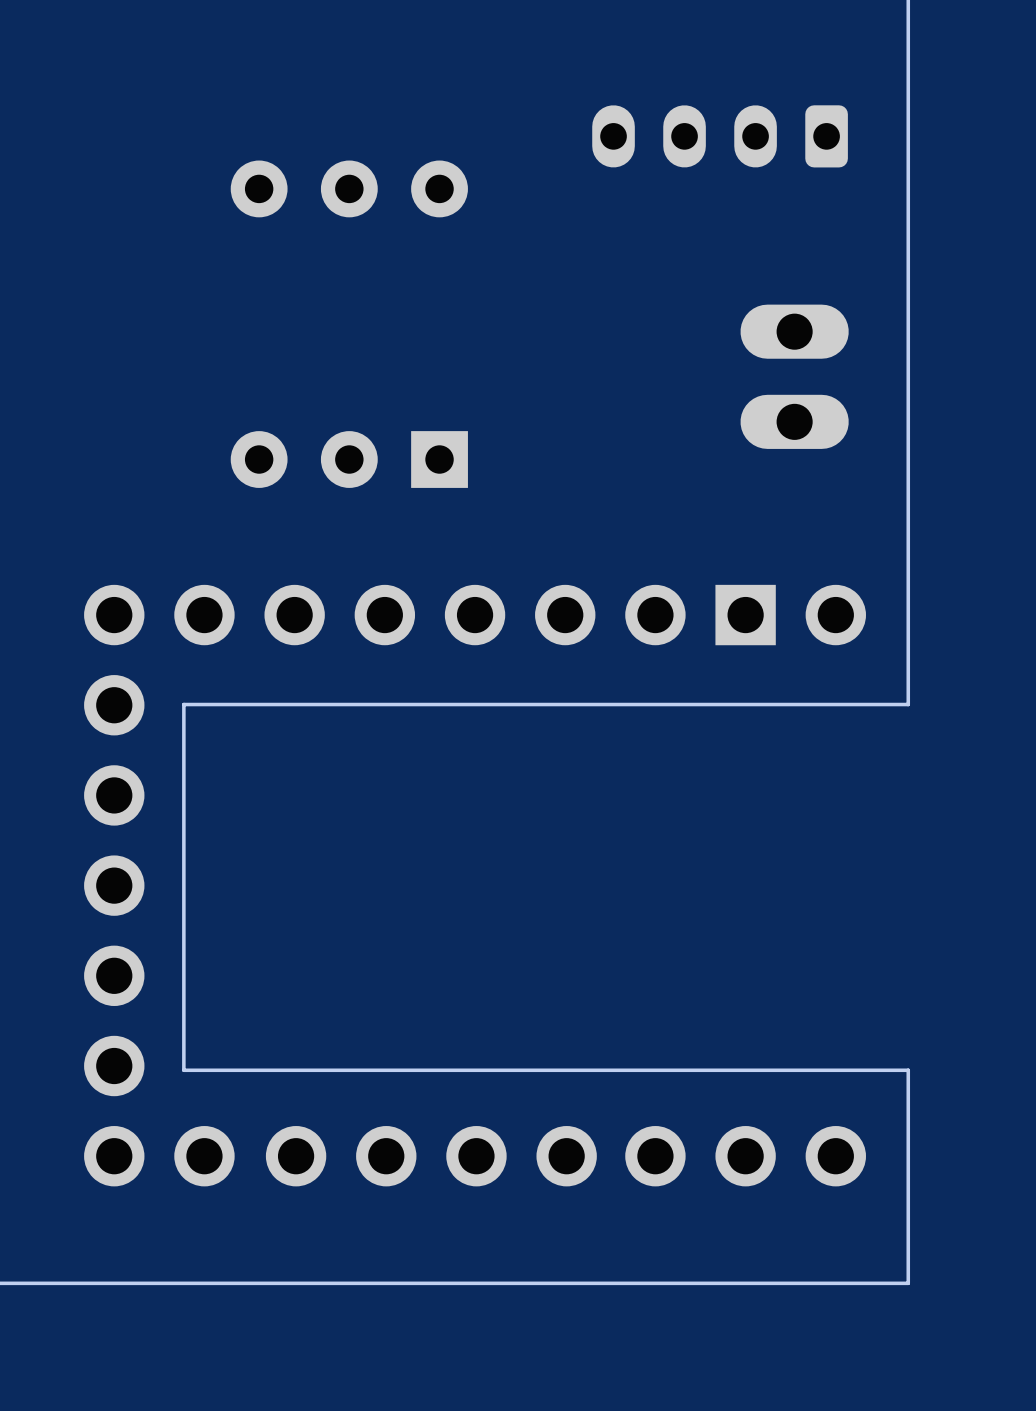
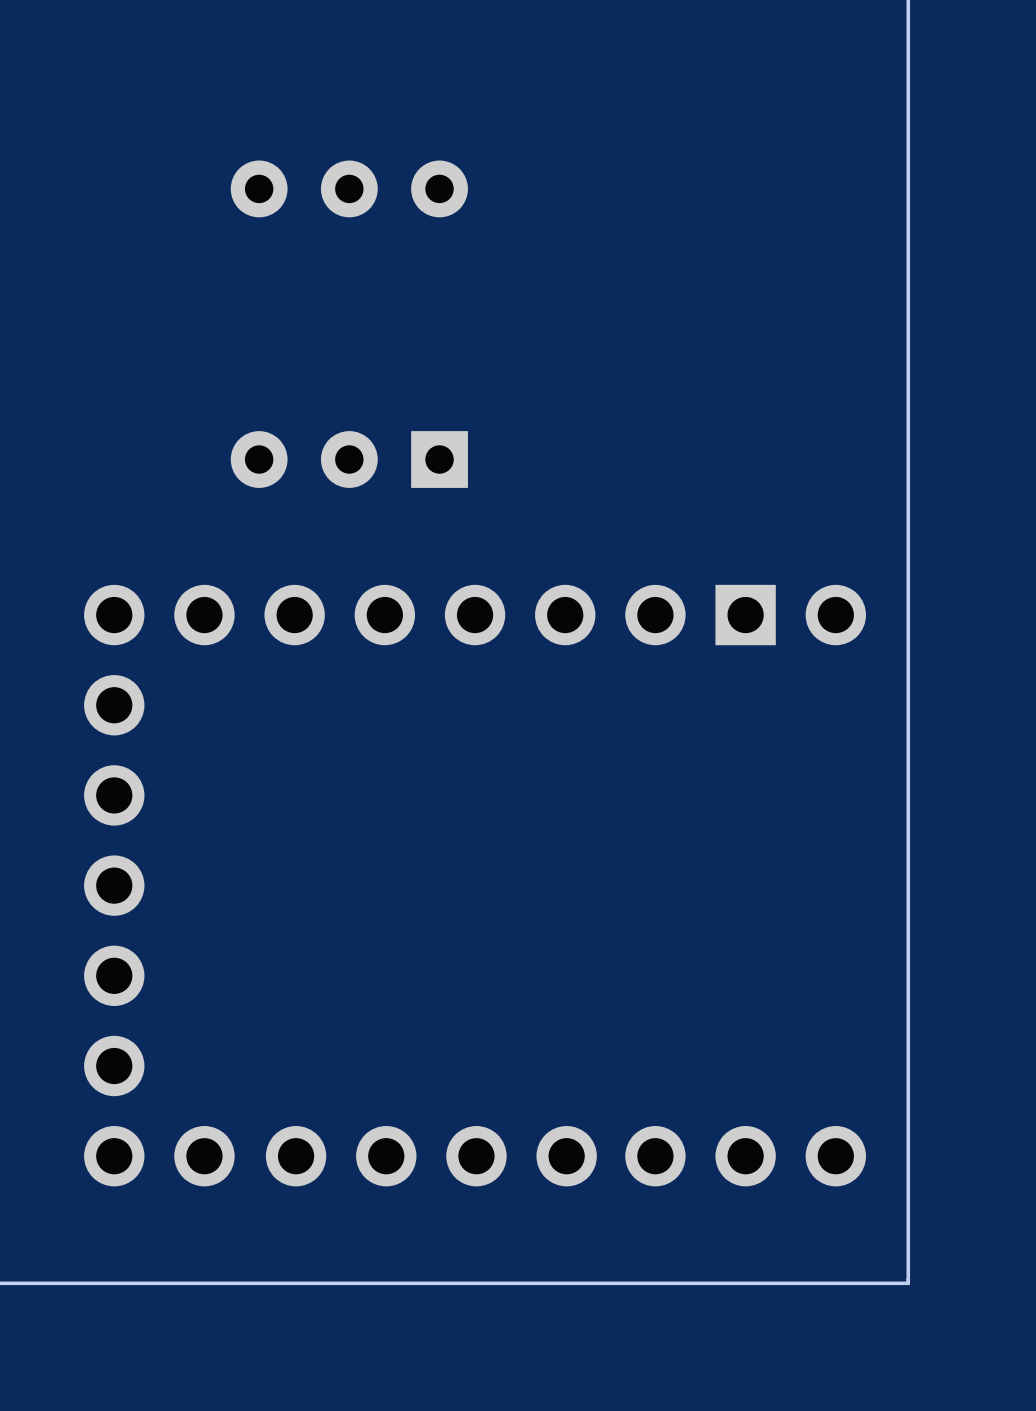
part: (720, 136) -> none
part: (794, 376) -> none
board edge: (908, 704) (183, 704) (183, 1070) (908, 1070) -> (908, 704) (908, 1070)

